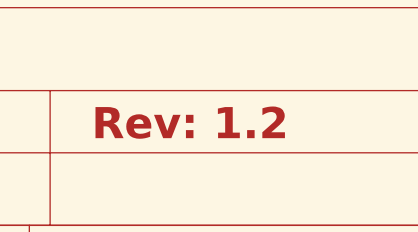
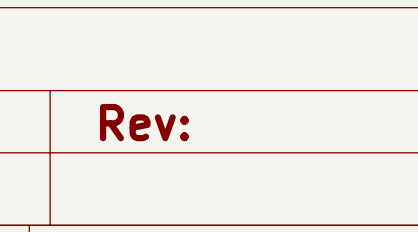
title block: Rev: 1.2 (190, 122) -> Rev: (144, 122)

